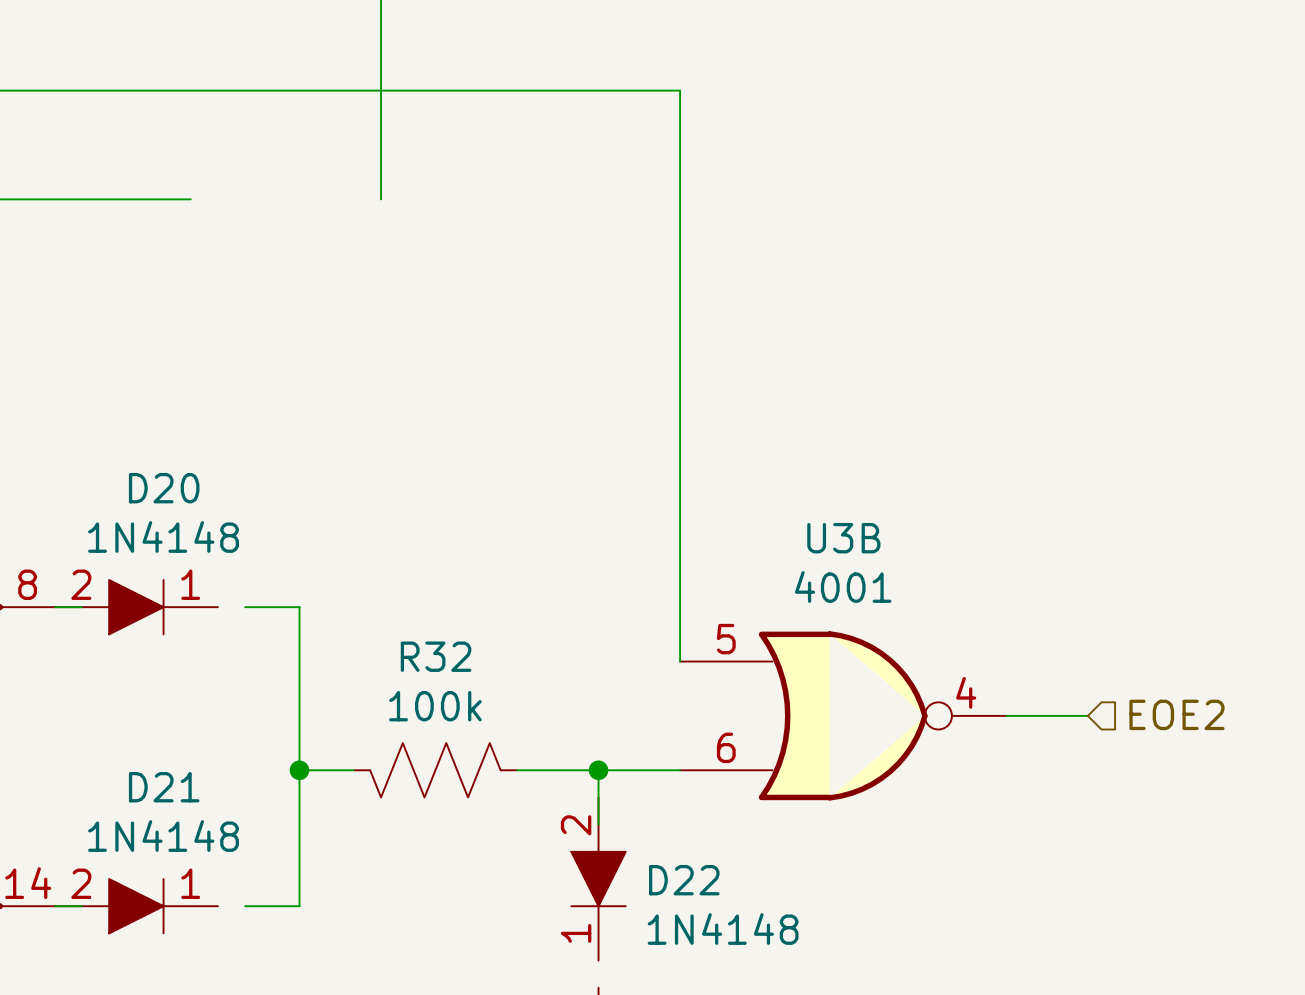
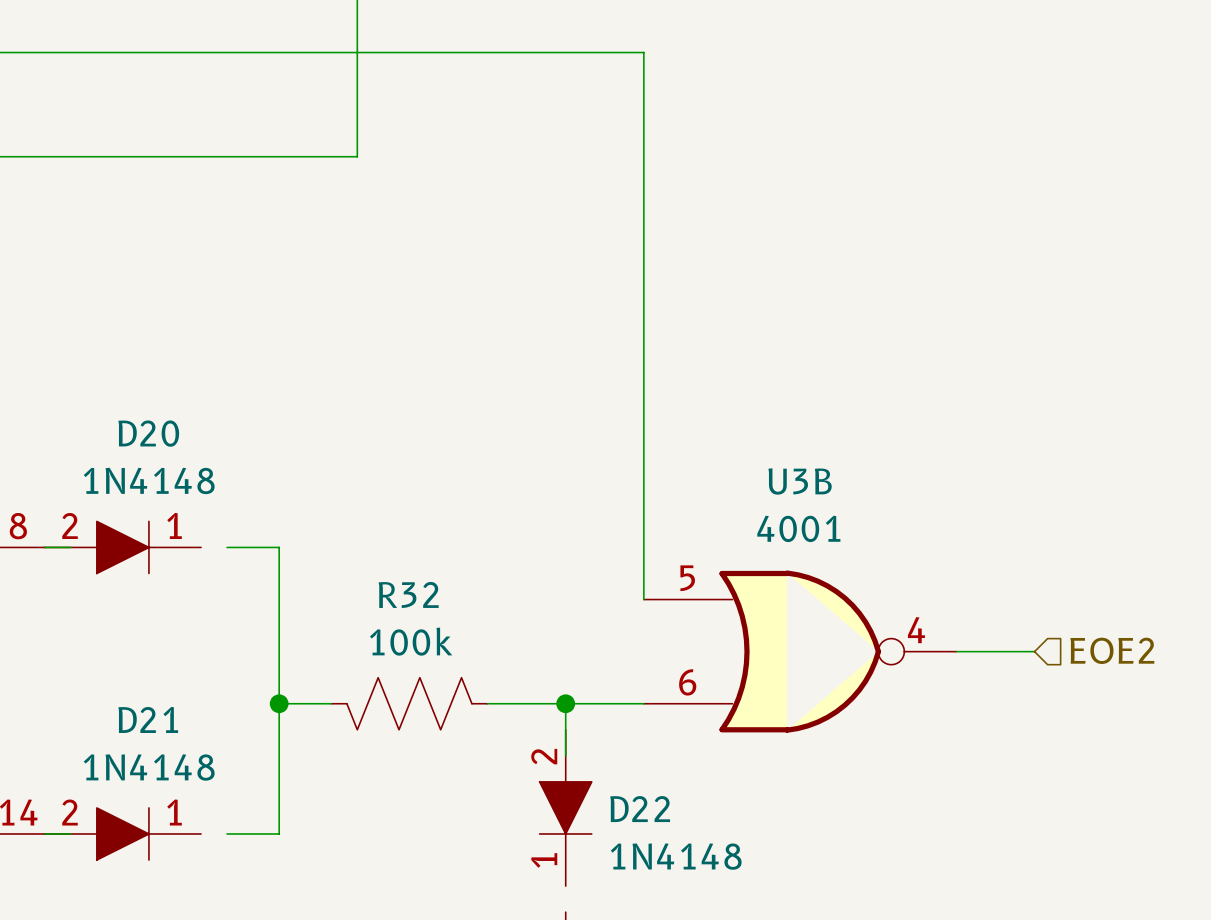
wire: none -> (174, 156) (357, 156)

